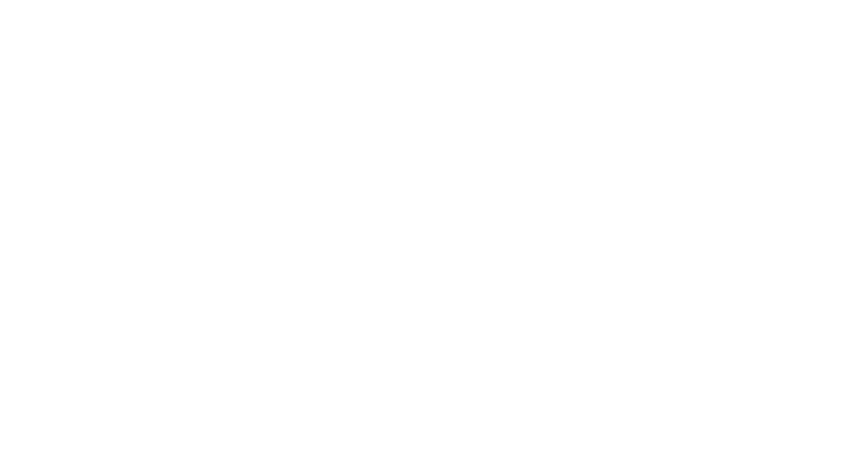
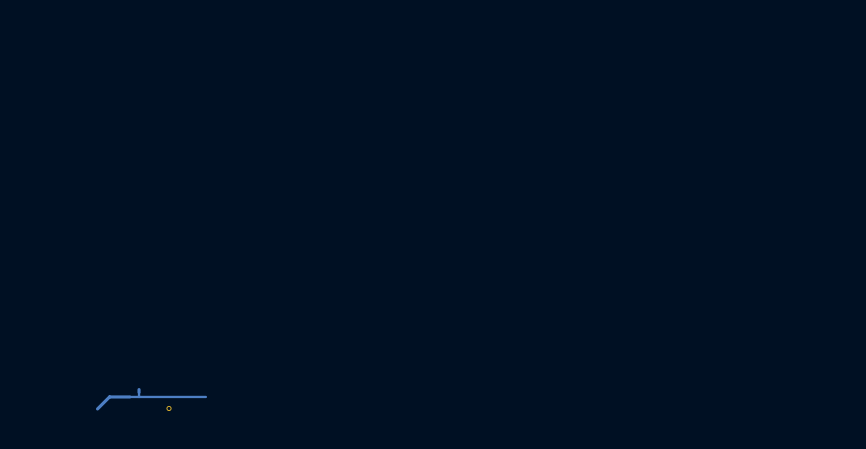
bottom track: none -> (139, 389) (139, 396)
bottom track: none -> (205, 396) (109, 396) (97, 408)
part: none -> (169, 408)

